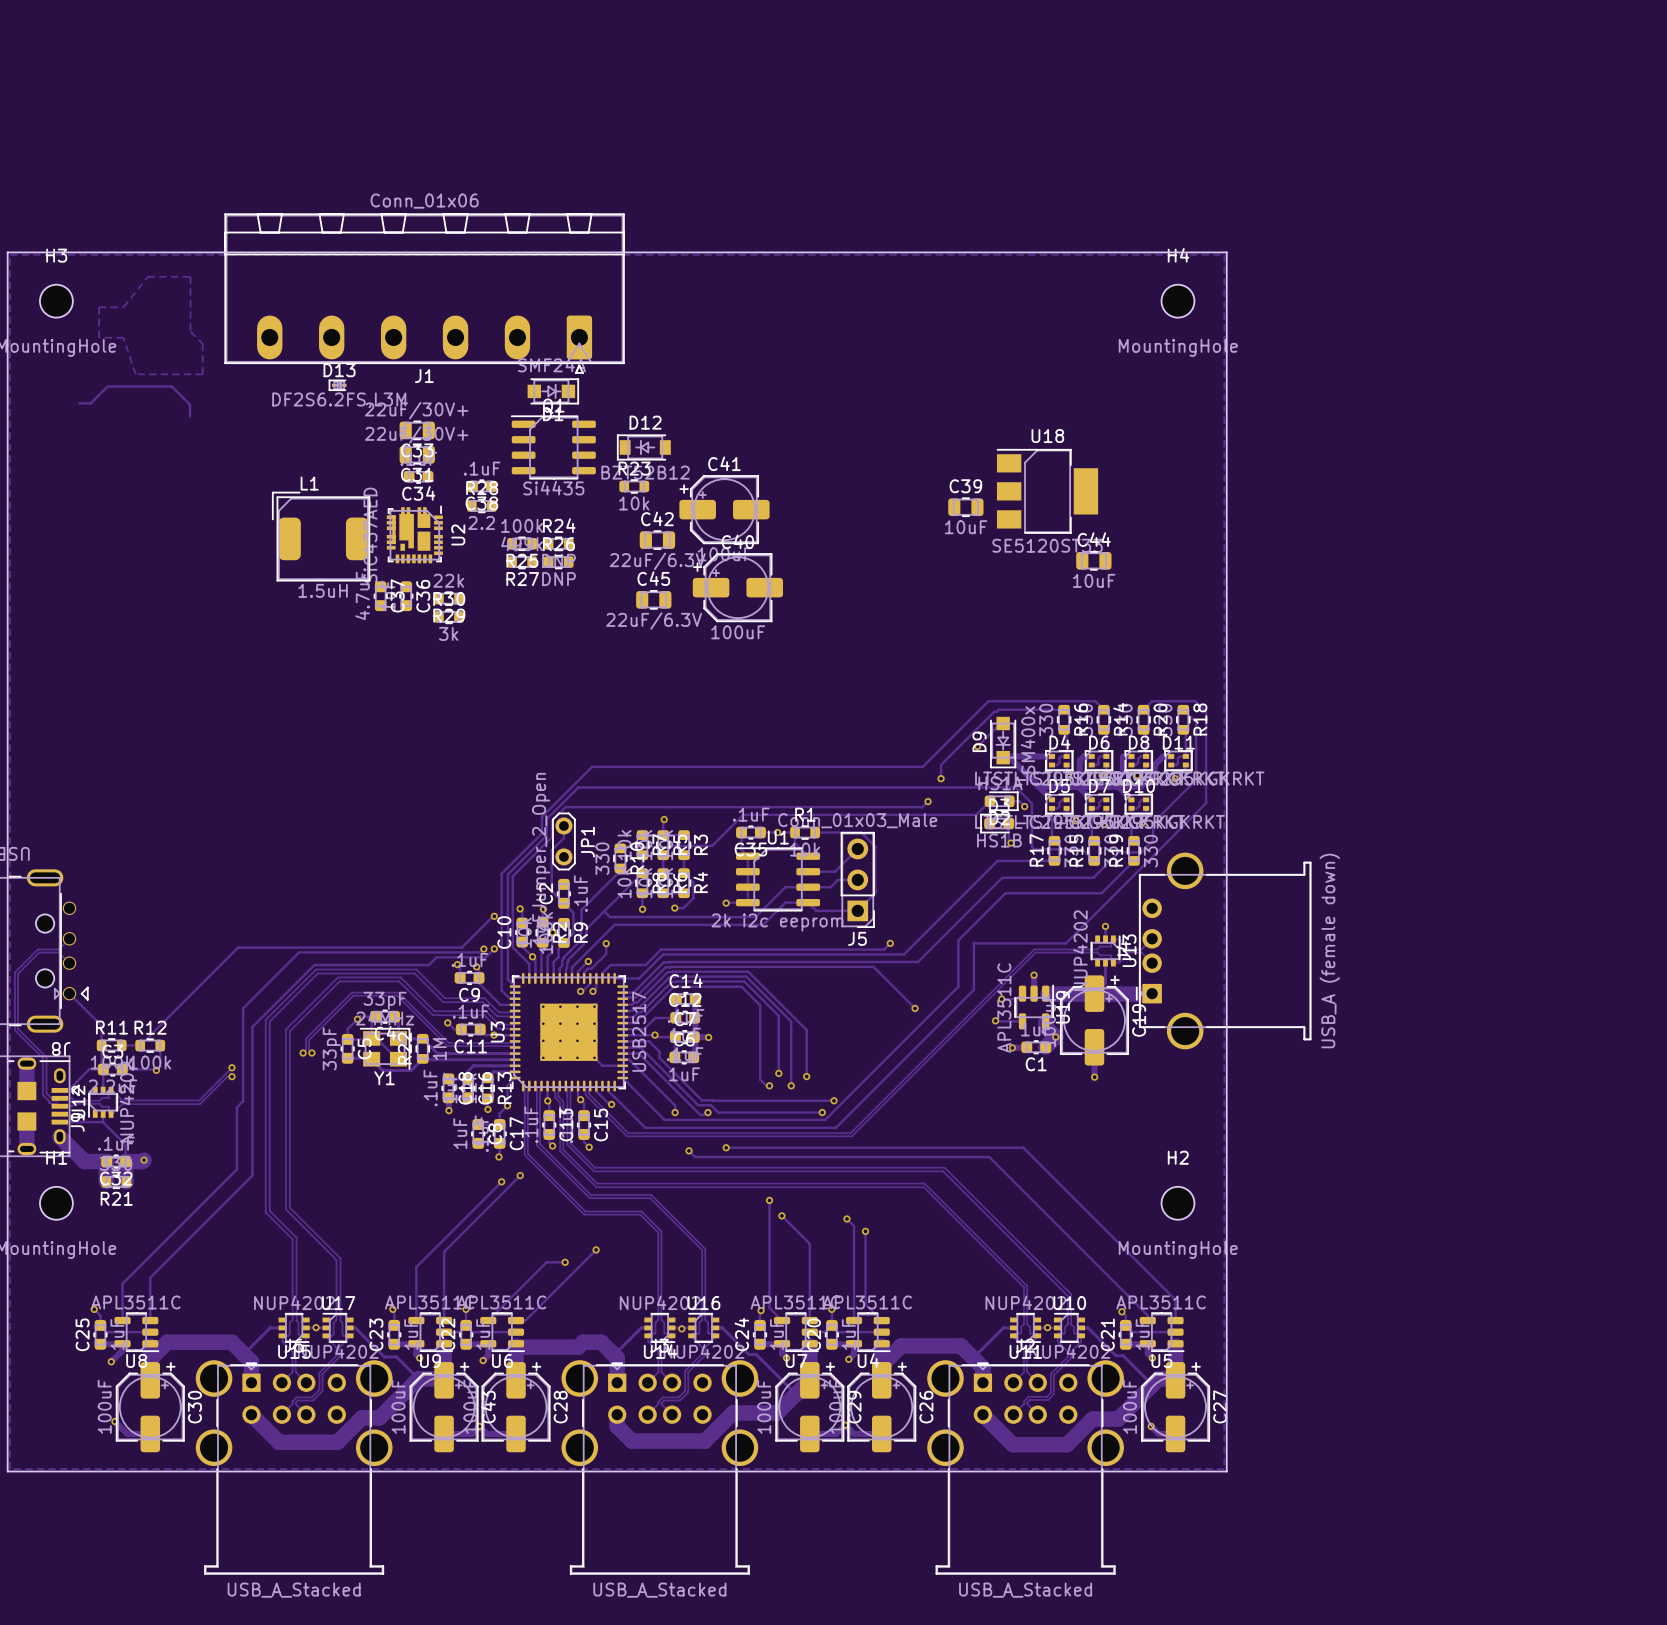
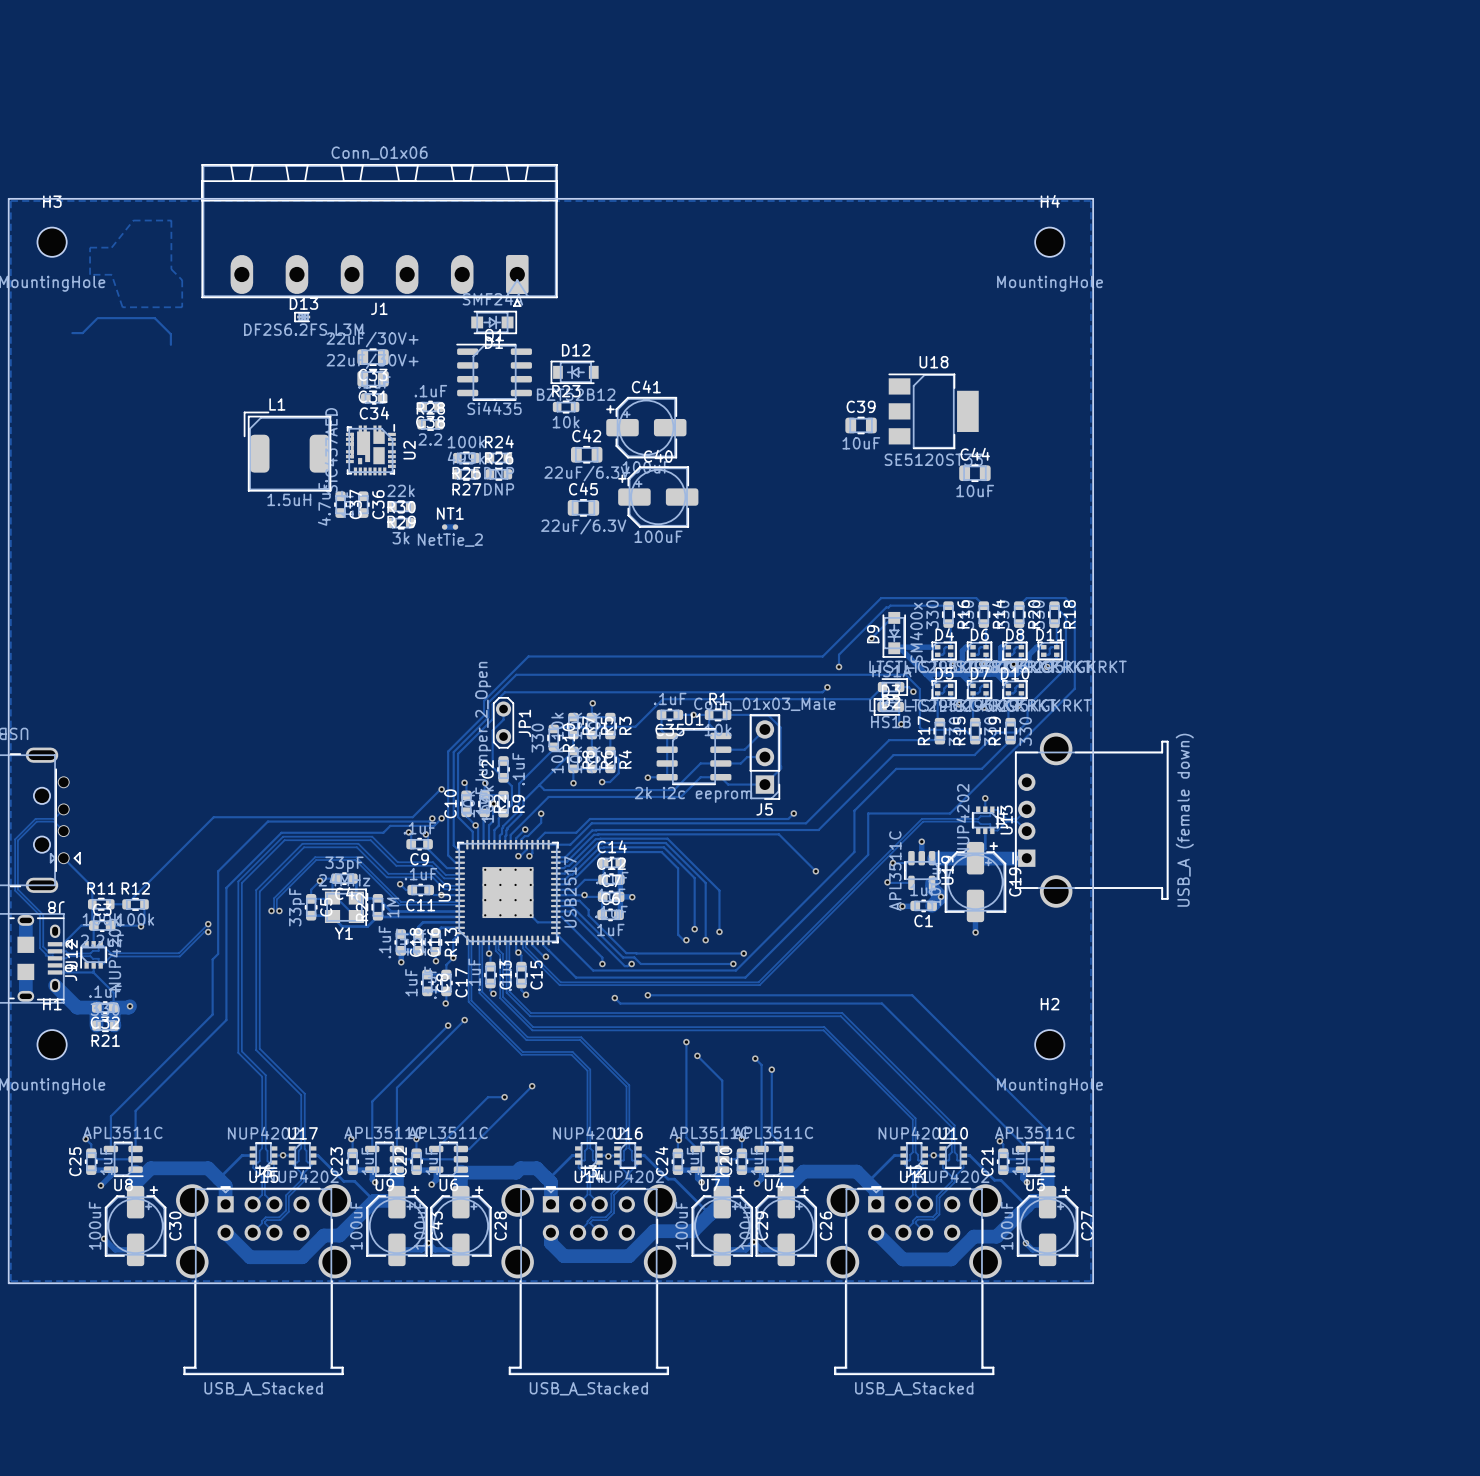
NT1: none -> NetTie_2 (450, 527)

